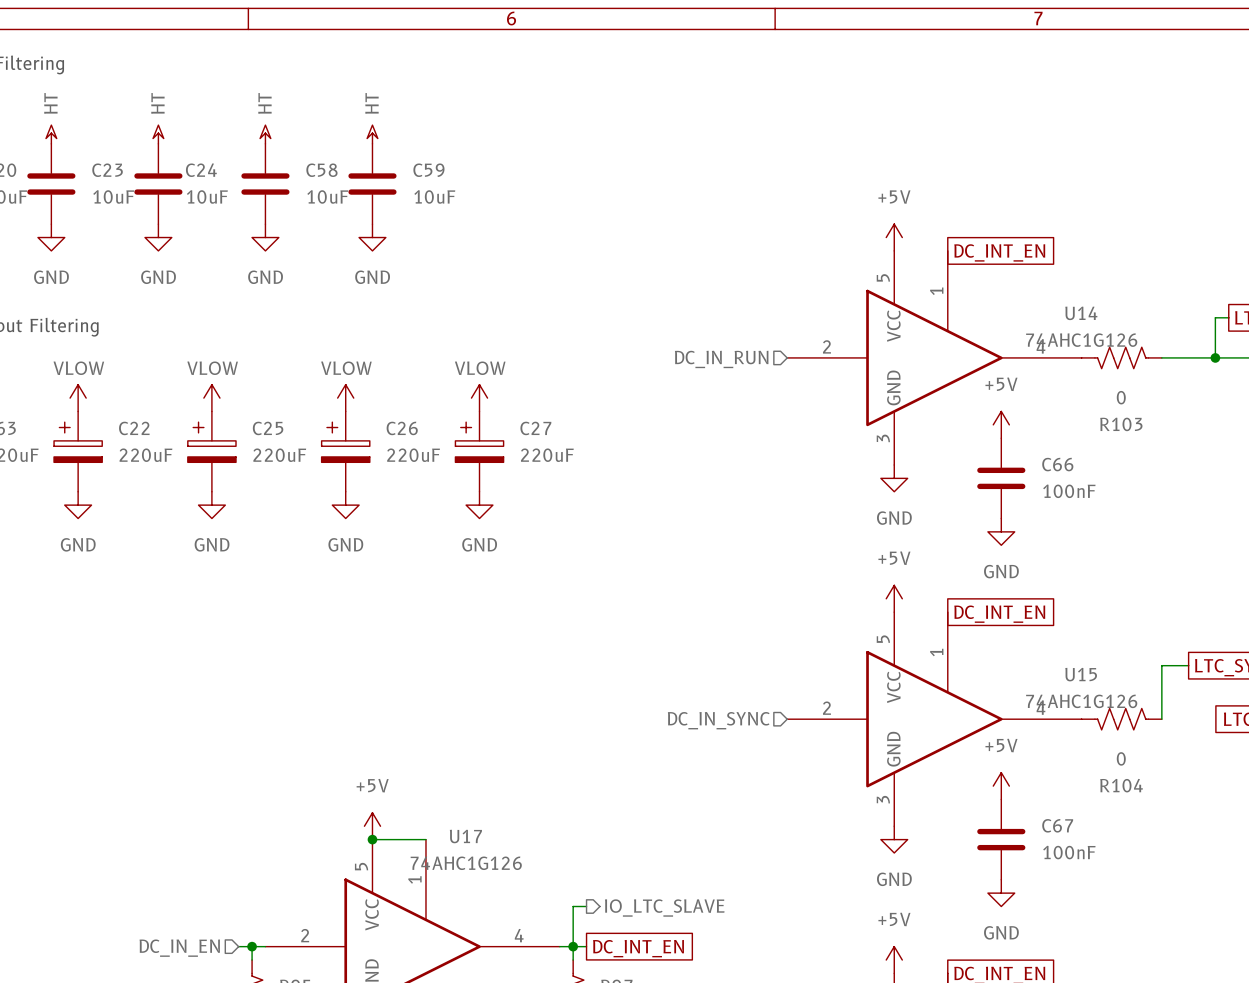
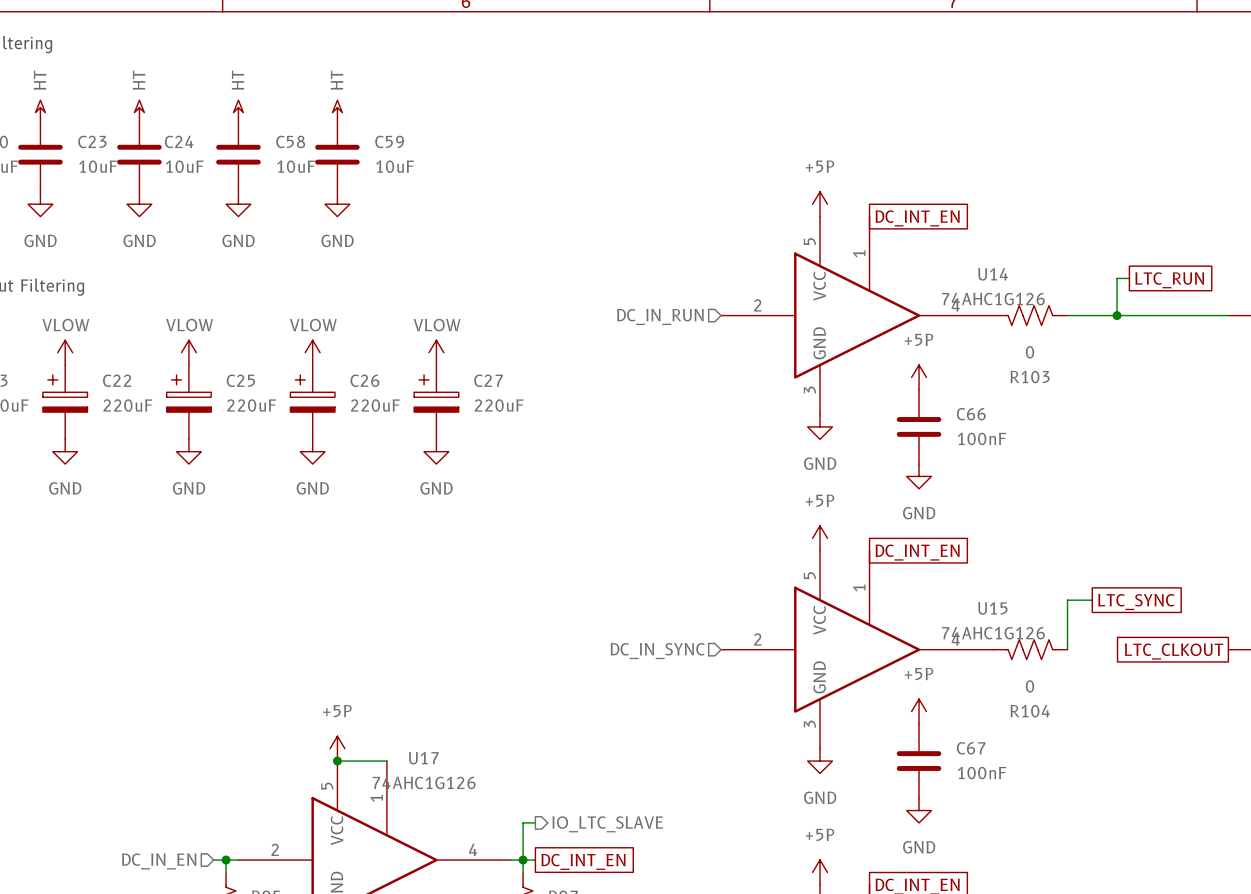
power symbol: +5V (894, 237) -> +5P (820, 204)
power symbol: +5V (1001, 424) -> +5P (919, 377)
power symbol: +5V (894, 598) -> +5P (820, 538)
power symbol: +5V (1001, 786) -> +5P (919, 711)
power symbol: +5V (372, 826) -> +5P (337, 748)
power symbol: +5V (894, 960) -> +5P (820, 872)

